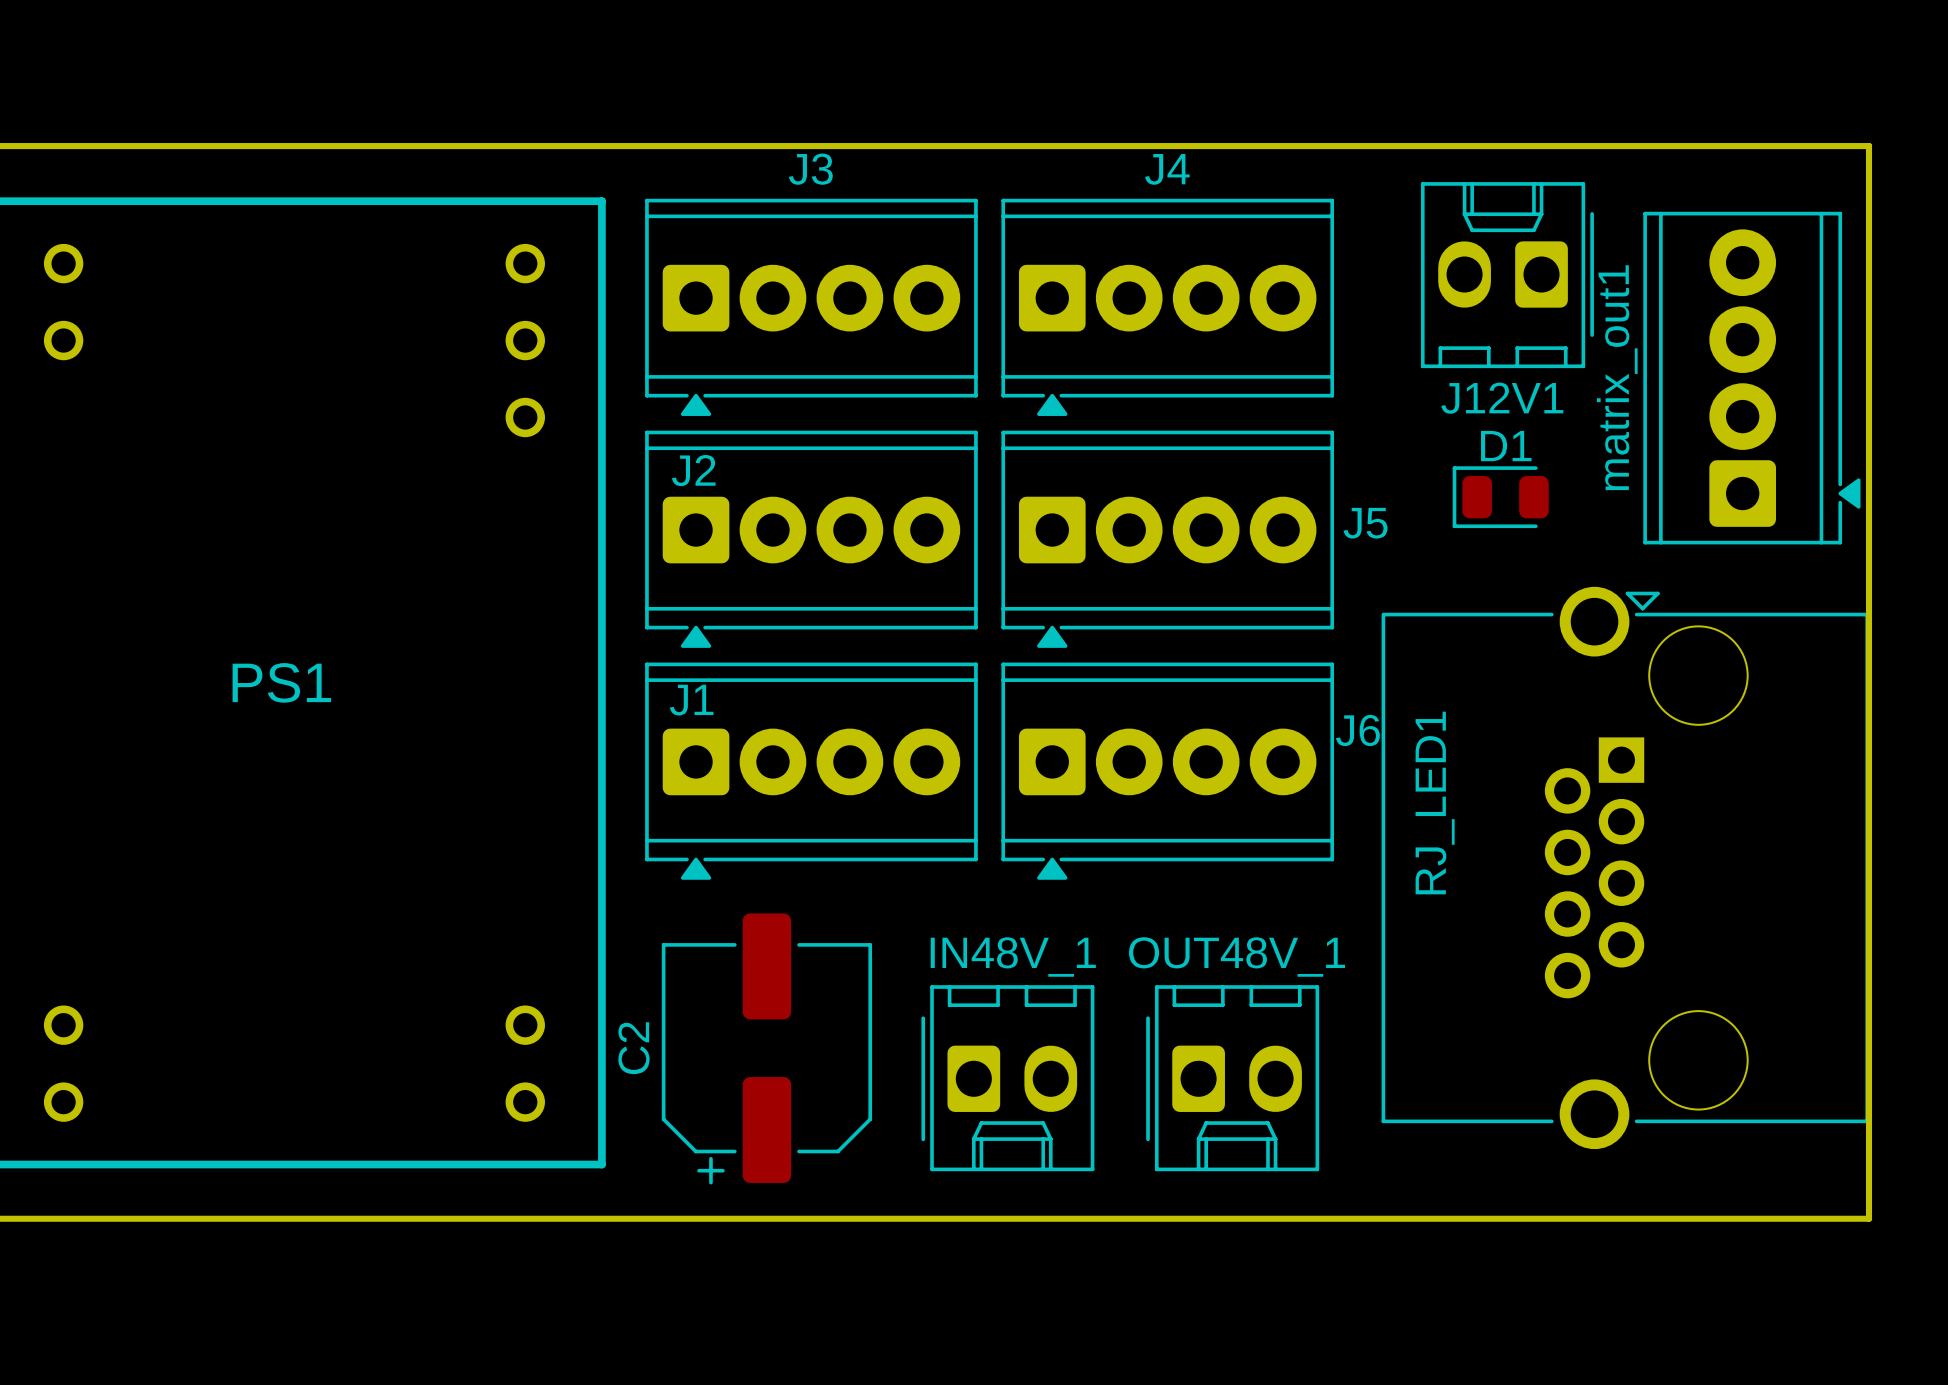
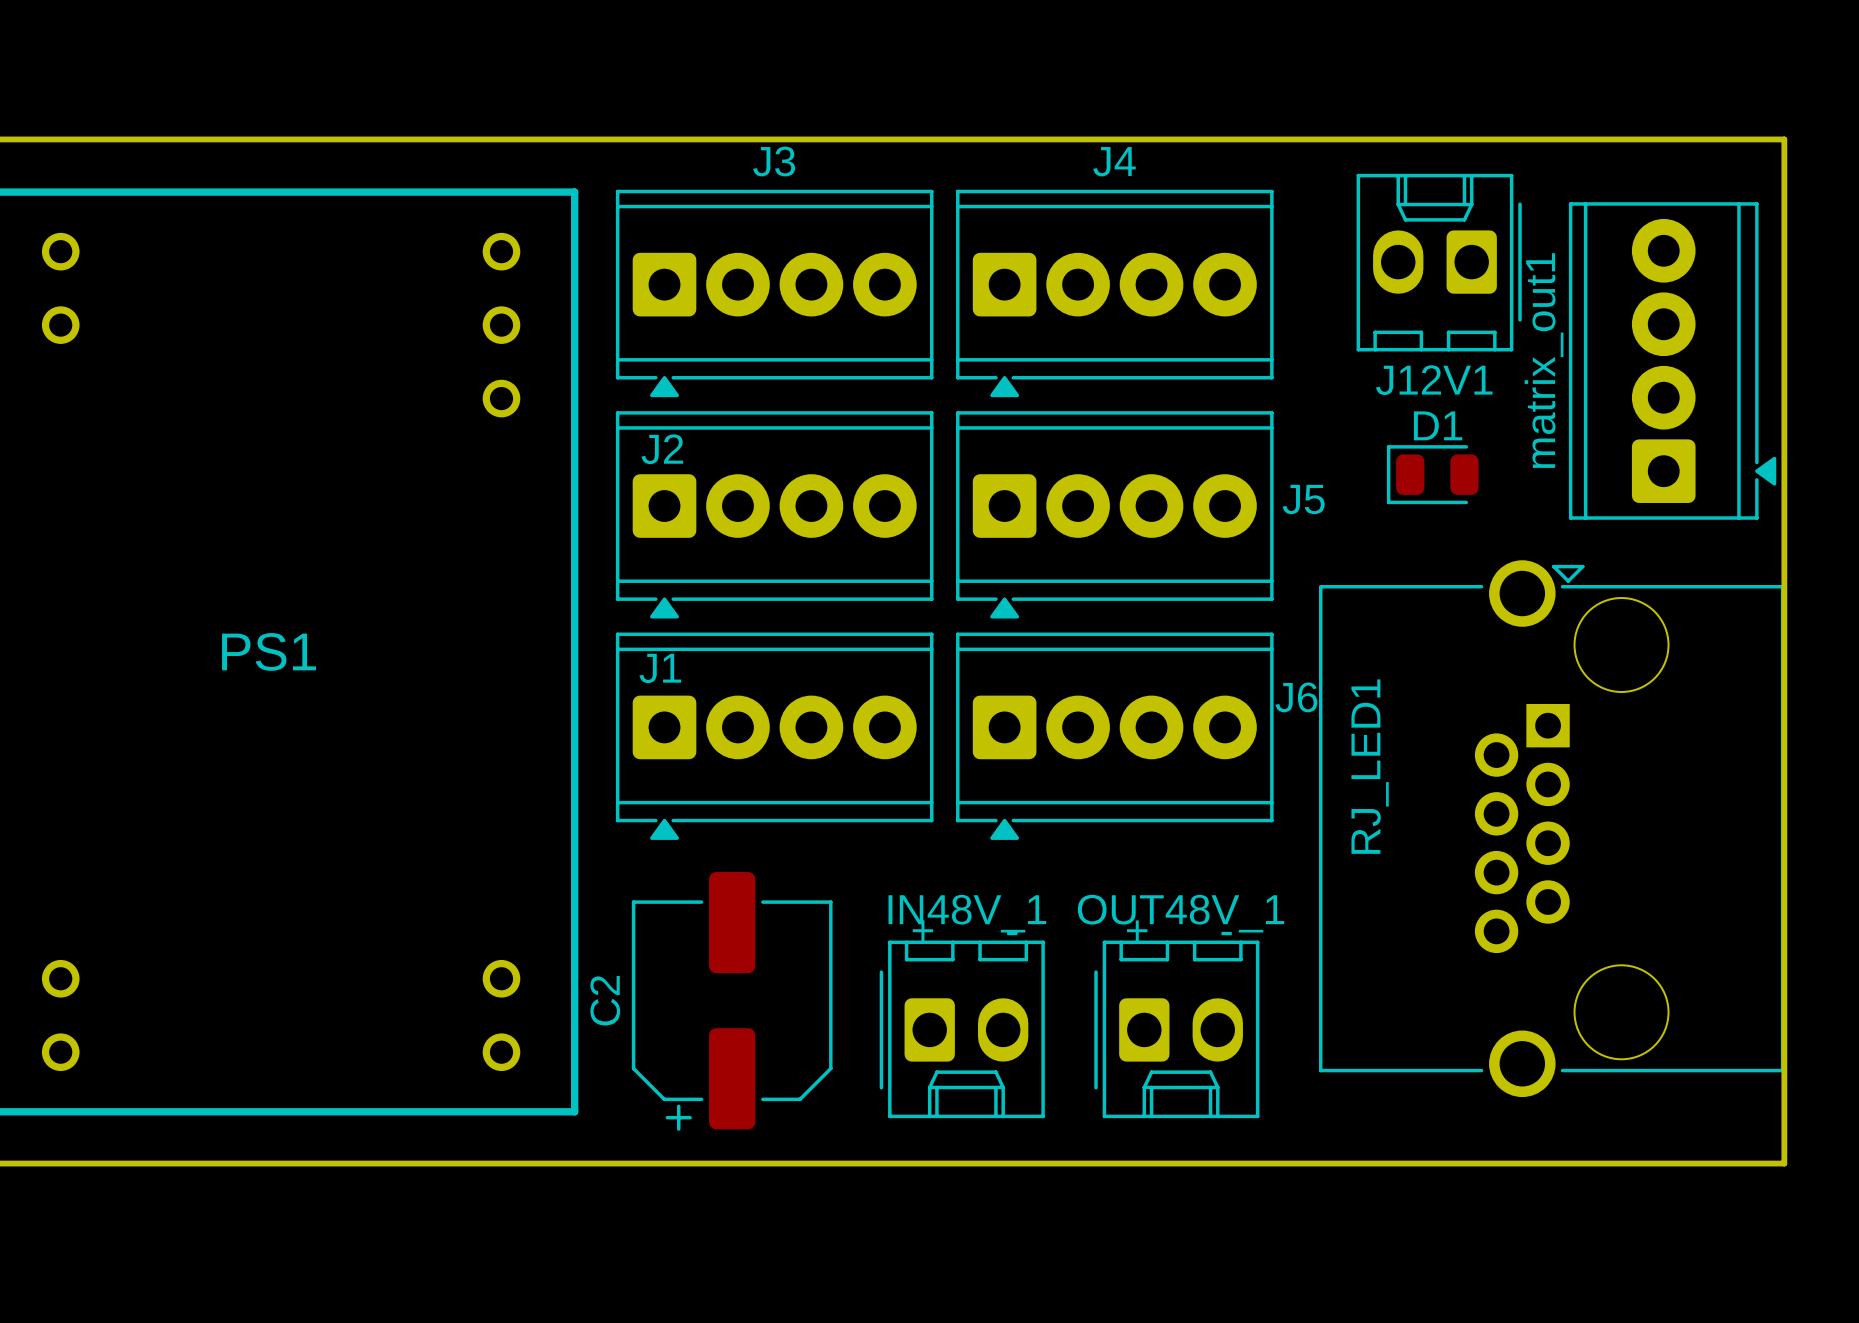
text: none -> + - (965, 930)
text: none -> + - (1179, 930)

